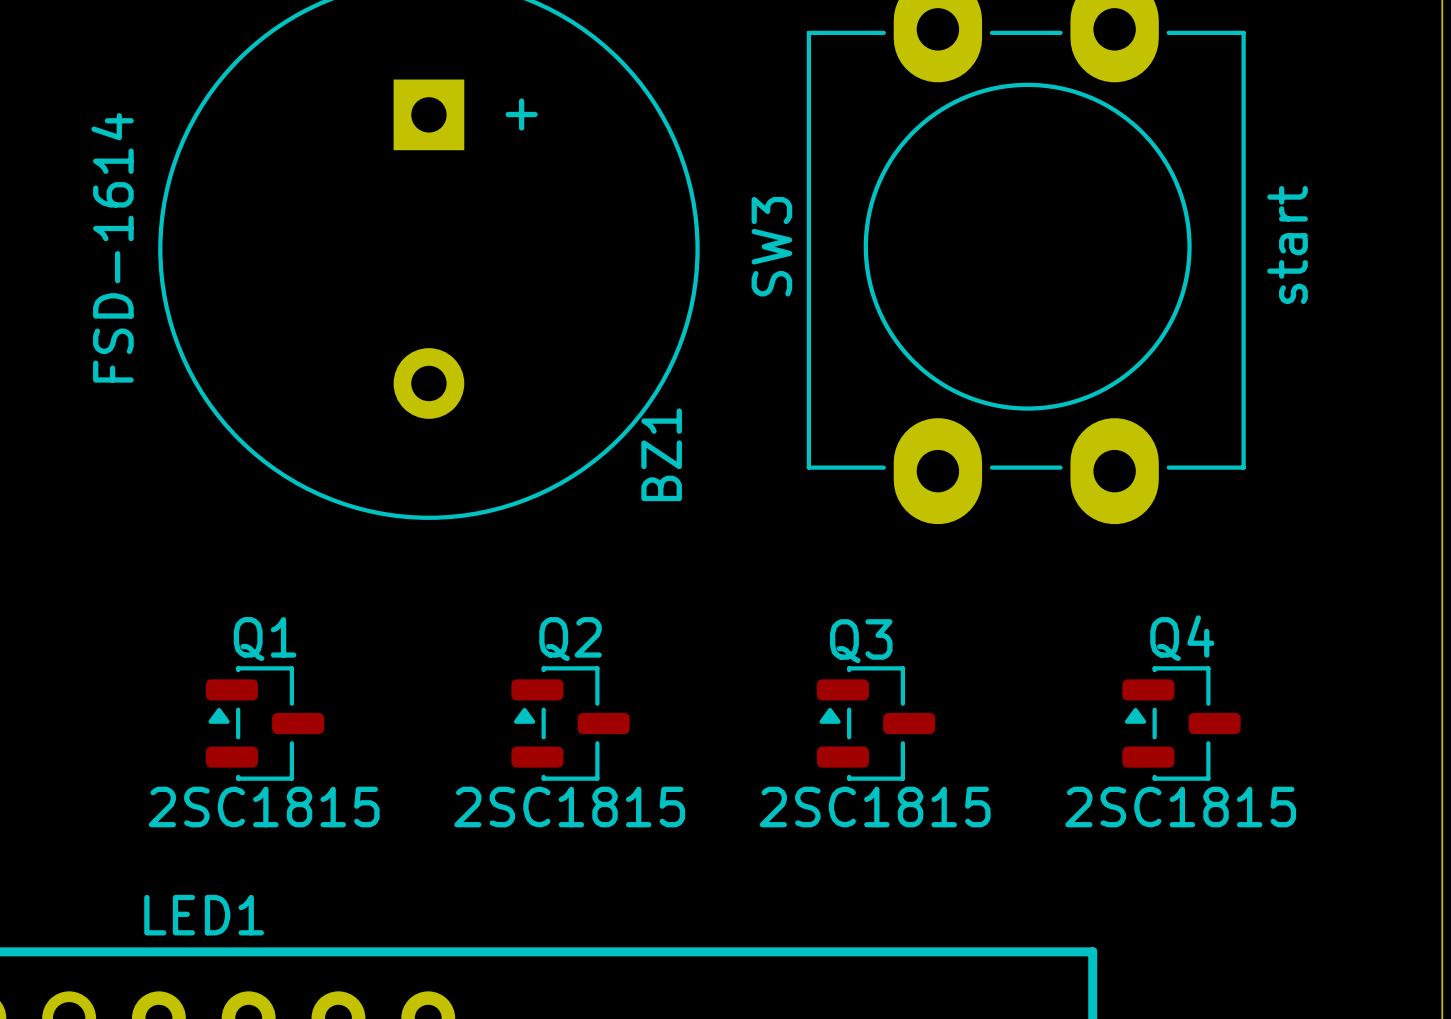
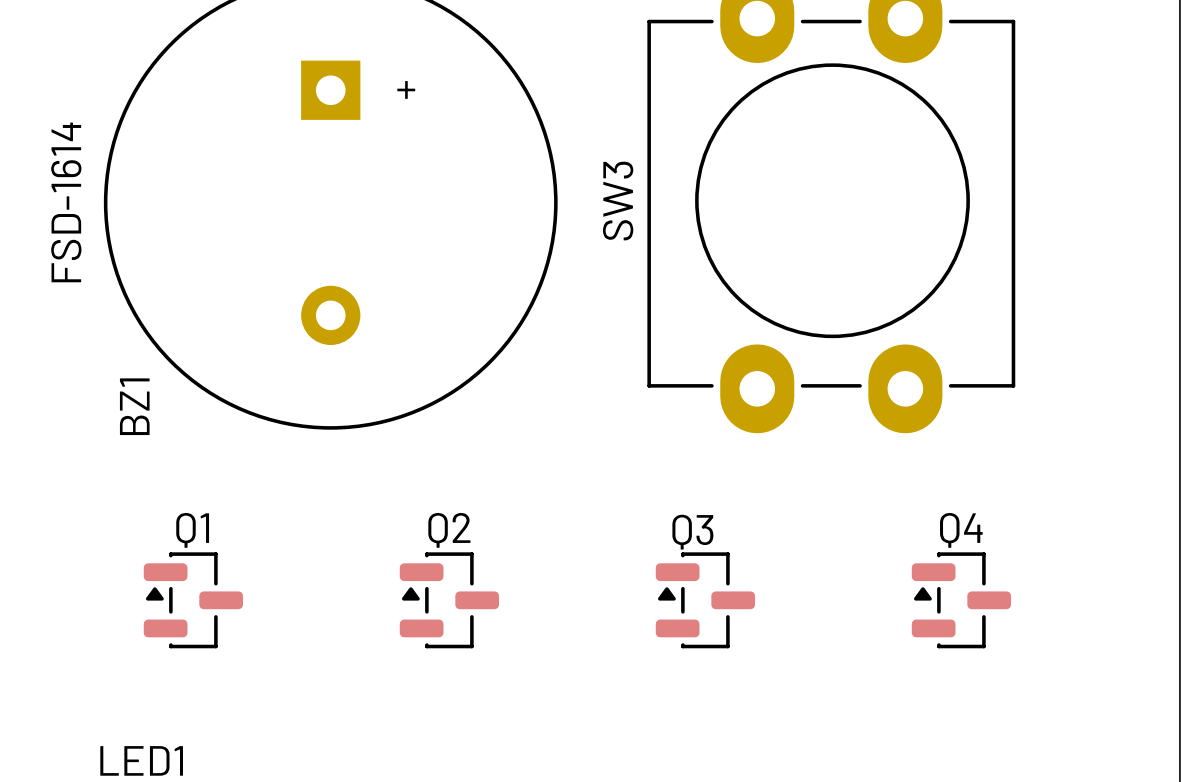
SW3 value: start (1287, 245) -> none
BZ1 name position: BZ1 (661, 454) -> BZ1 (134, 406)
Q1 value: 2SC1815 (264, 807) -> none
Q2 value: 2SC1815 (569, 807) -> none
Q3 value: 2SC1815 (875, 807) -> none
Q4 value: 2SC1815 (1180, 807) -> none

